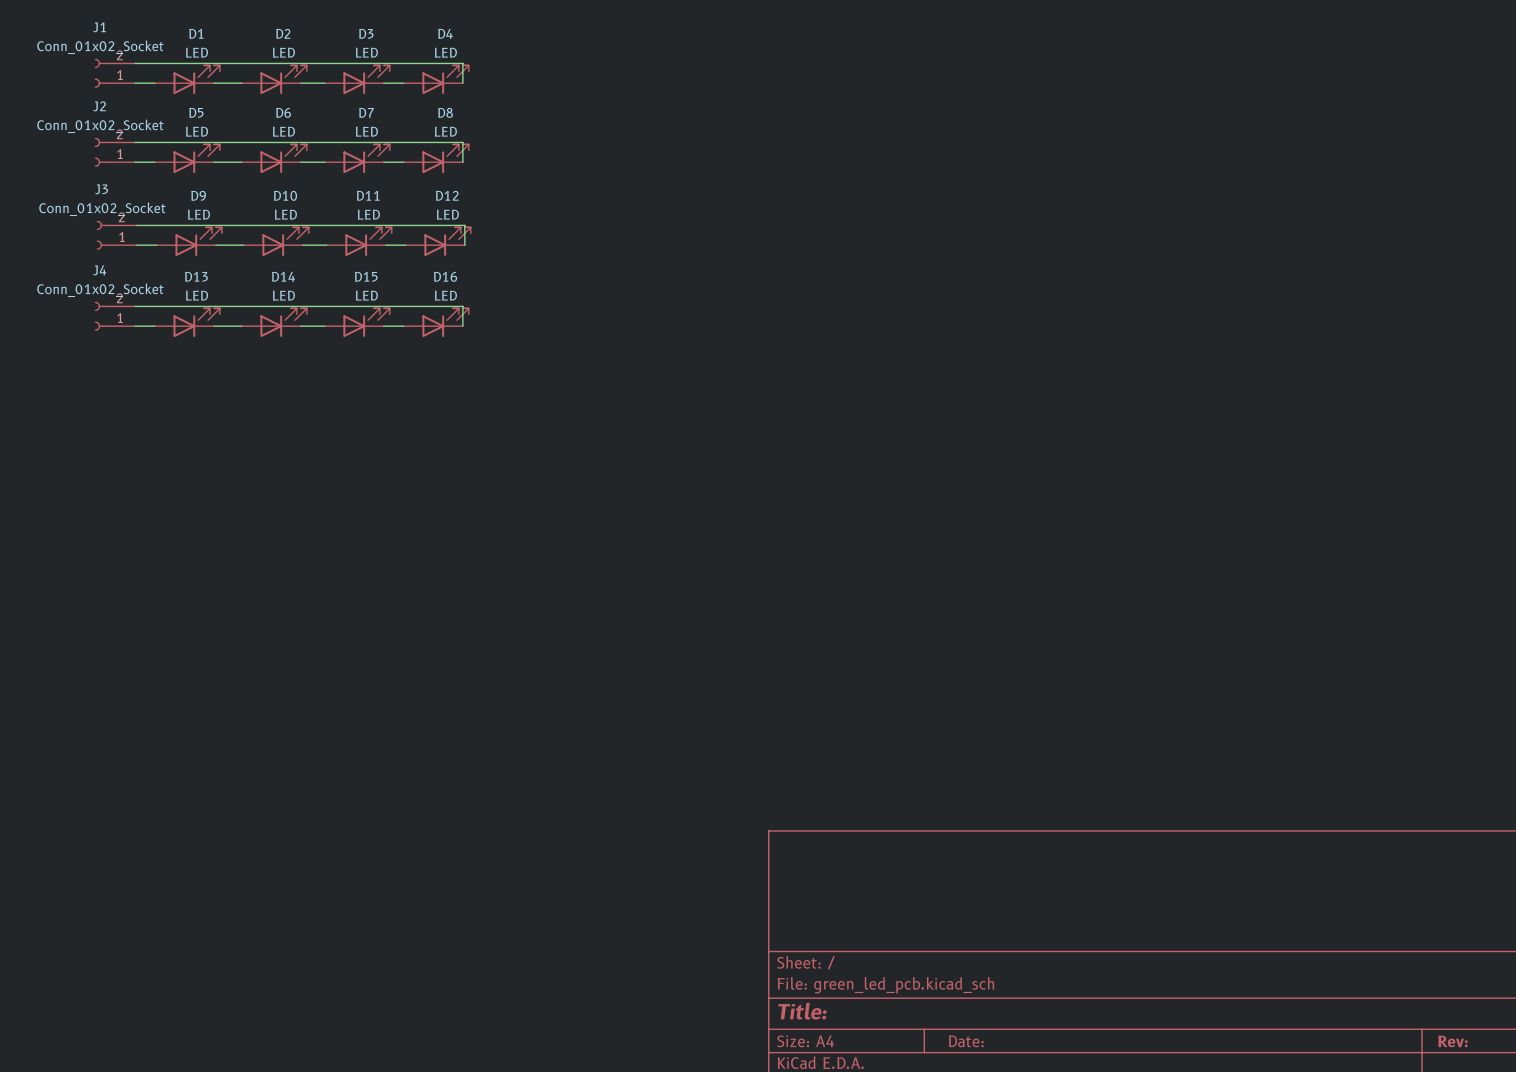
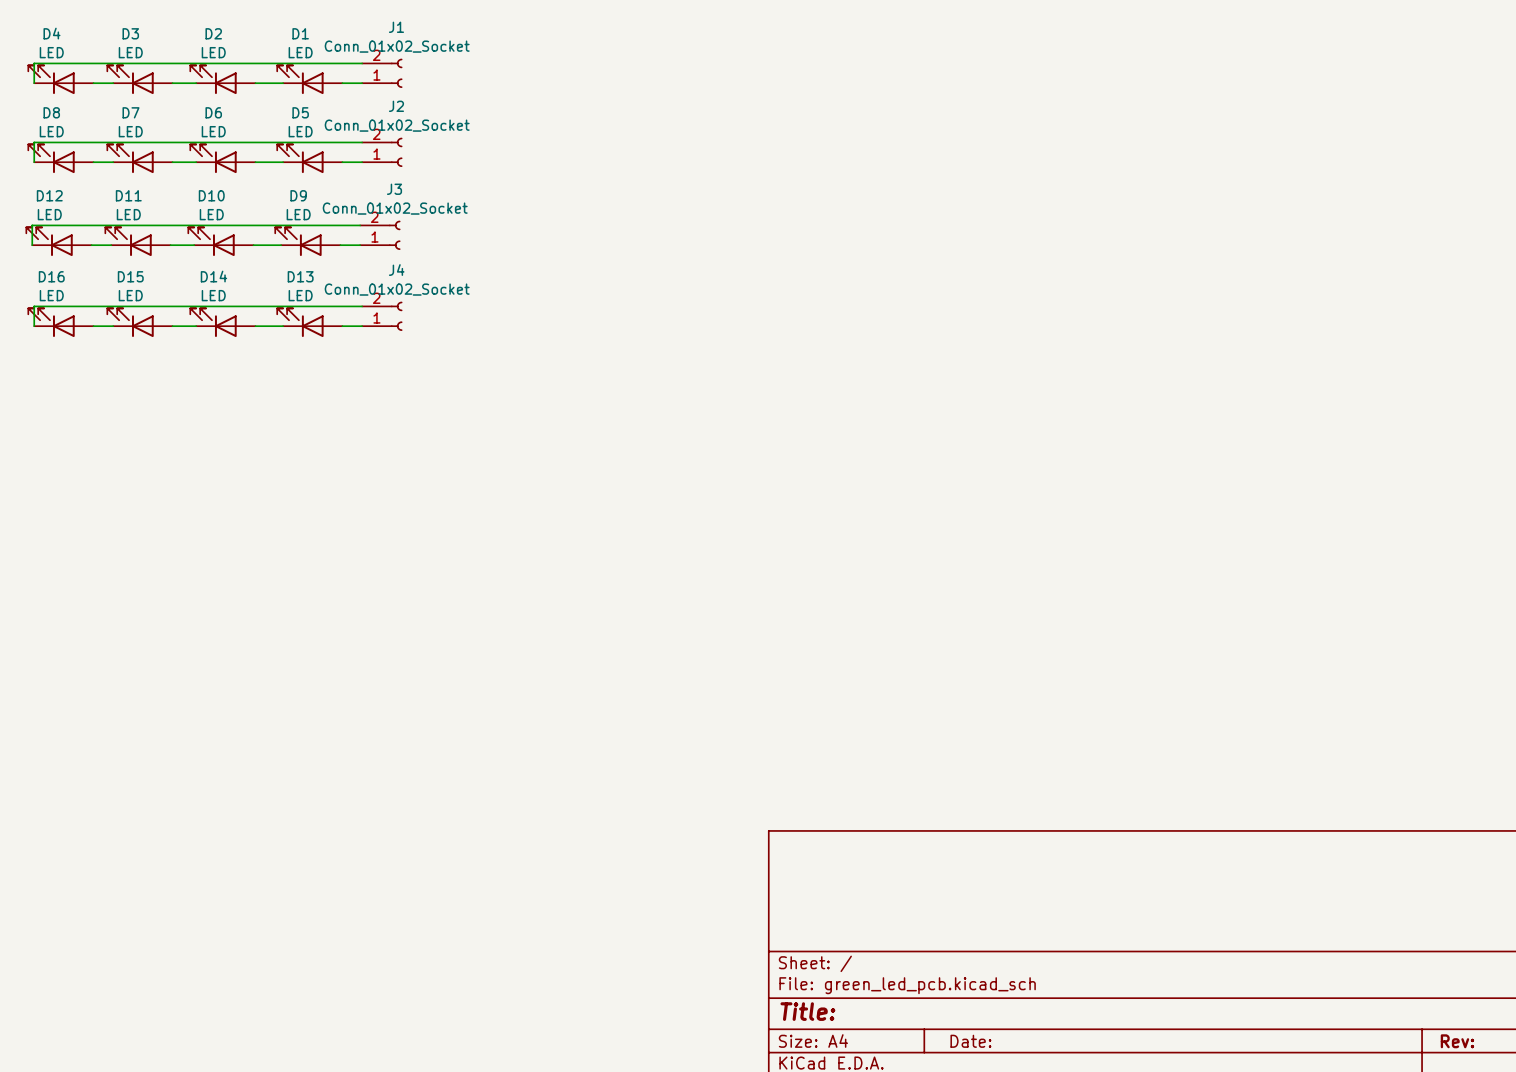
wire: none -> (134, 63) (34, 63) (34, 83)
wire: (362, 63) (462, 63) (462, 83) -> none
J1 flip: as is (100, 73) -> left-right (396, 73)
J1 position: (114, 73) -> (382, 73)
D1 position: (187, 79) -> (309, 79)
D1 flip: as is (196, 79) -> left-right (300, 79)
D2 position: (274, 79) -> (222, 79)
D2 flip: as is (283, 79) -> left-right (213, 79)
D3 position: (357, 79) -> (139, 79)
D3 flip: as is (366, 79) -> left-right (130, 79)
D4 position: (436, 79) -> (60, 79)
D4 flip: as is (445, 79) -> left-right (51, 79)
wire: none -> (134, 142) (34, 142) (34, 162)
wire: (362, 142) (462, 142) (462, 162) -> none
J2 flip: as is (100, 152) -> left-right (396, 152)
J2 position: (114, 152) -> (382, 152)
D5 position: (187, 158) -> (309, 158)
D5 flip: as is (196, 158) -> left-right (300, 158)
D6 position: (274, 158) -> (222, 158)
D6 flip: as is (283, 158) -> left-right (213, 158)
D7 position: (357, 158) -> (139, 158)
D7 flip: as is (366, 158) -> left-right (130, 158)
D8 position: (436, 158) -> (60, 158)
D8 flip: as is (445, 158) -> left-right (51, 158)
wire: none -> (136, 225) (32, 225) (32, 245)
wire: (360, 225) (464, 225) (464, 245) -> none
J3 flip: as is (102, 235) -> left-right (394, 235)
J3 position: (116, 235) -> (380, 235)
D9 position: (189, 241) -> (307, 241)
D9 flip: as is (198, 241) -> left-right (298, 241)
D10 position: (276, 241) -> (220, 241)
D10 flip: as is (285, 241) -> left-right (211, 241)
D11 position: (359, 241) -> (137, 241)
D11 flip: as is (368, 241) -> left-right (128, 241)
D12 position: (438, 241) -> (58, 241)
D12 flip: as is (447, 241) -> left-right (49, 241)
wire: none -> (134, 306) (34, 306) (34, 326)
wire: (362, 306) (462, 306) (462, 326) -> none
J4 flip: as is (100, 316) -> left-right (396, 316)
J4 position: (114, 316) -> (382, 316)
D13 position: (187, 322) -> (309, 322)
D13 flip: as is (196, 322) -> left-right (300, 322)
D14 position: (274, 322) -> (222, 322)
D14 flip: as is (283, 322) -> left-right (213, 322)
D15 position: (357, 322) -> (139, 322)
D15 flip: as is (366, 322) -> left-right (130, 322)
D16 position: (436, 322) -> (60, 322)
D16 flip: as is (445, 322) -> left-right (51, 322)

